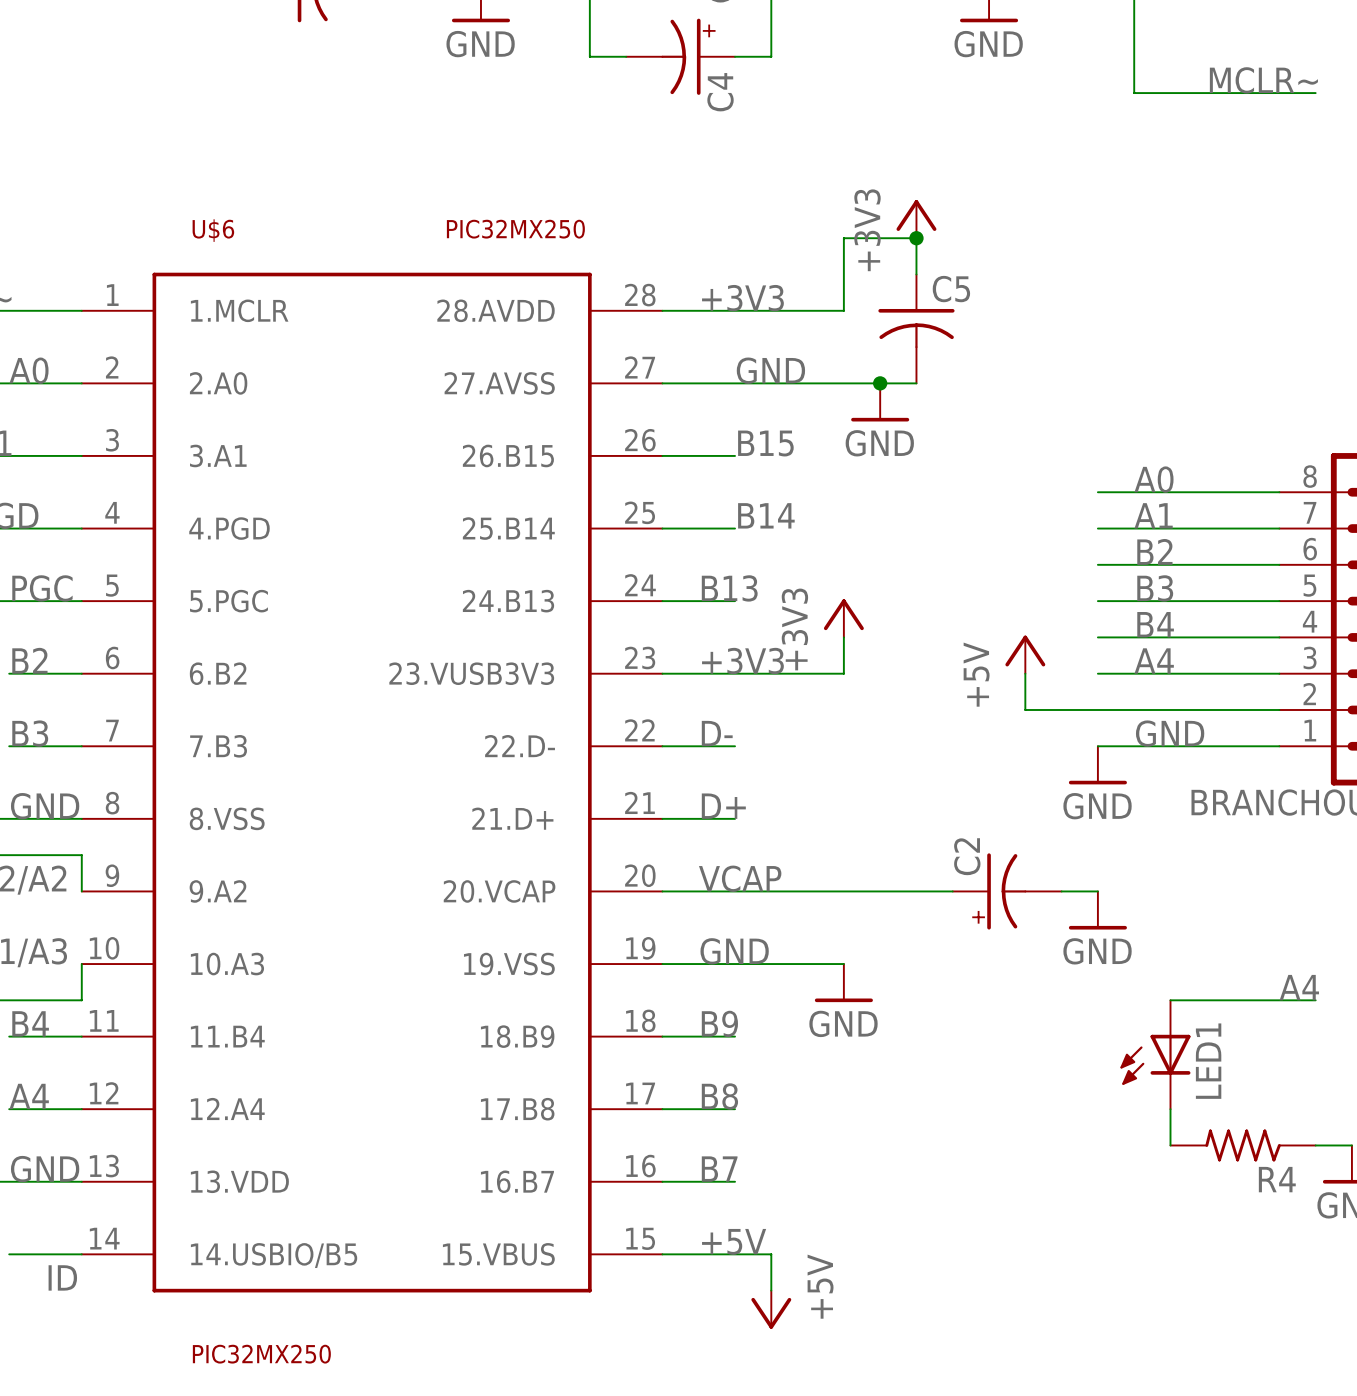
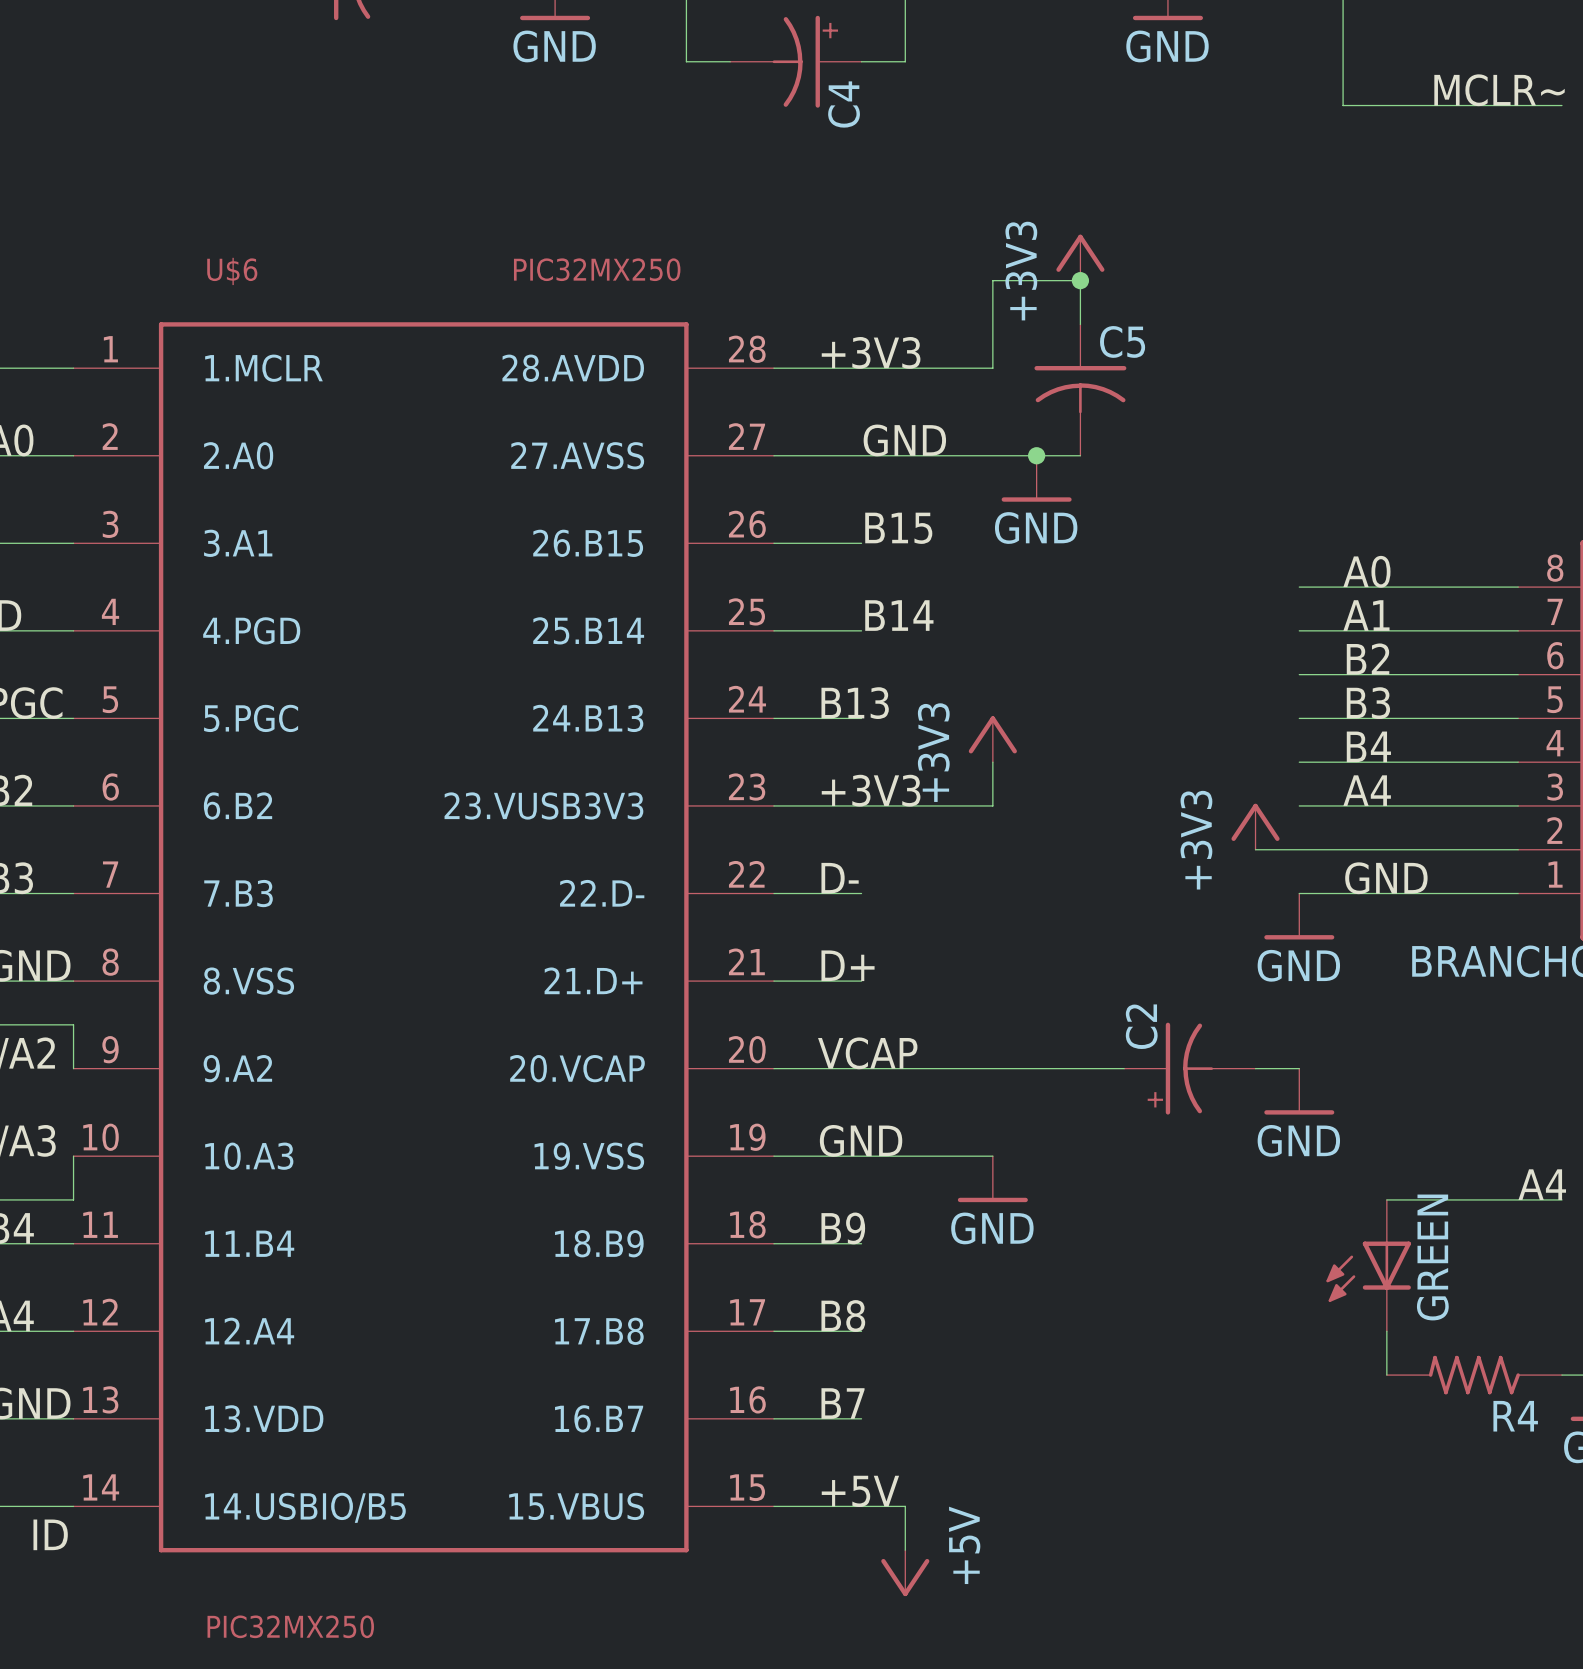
power symbol: +5V (1025, 654) -> none
wire: (1025, 673) (1025, 709) (1061, 709) -> none
power symbol: none -> +3V3 (1255, 826)
LED1 name: LED1 (1208, 1061) -> GREEN (1432, 1257)

